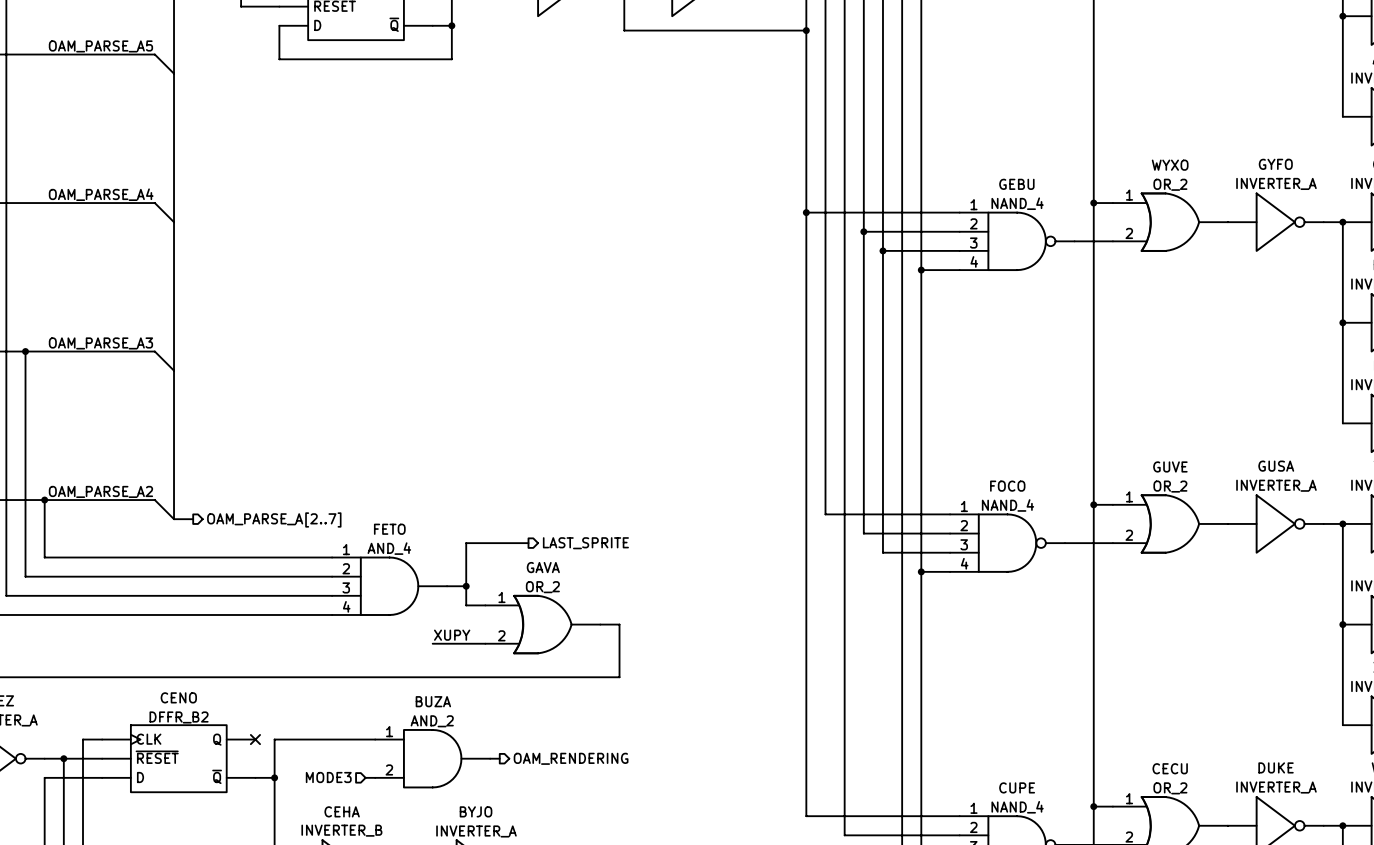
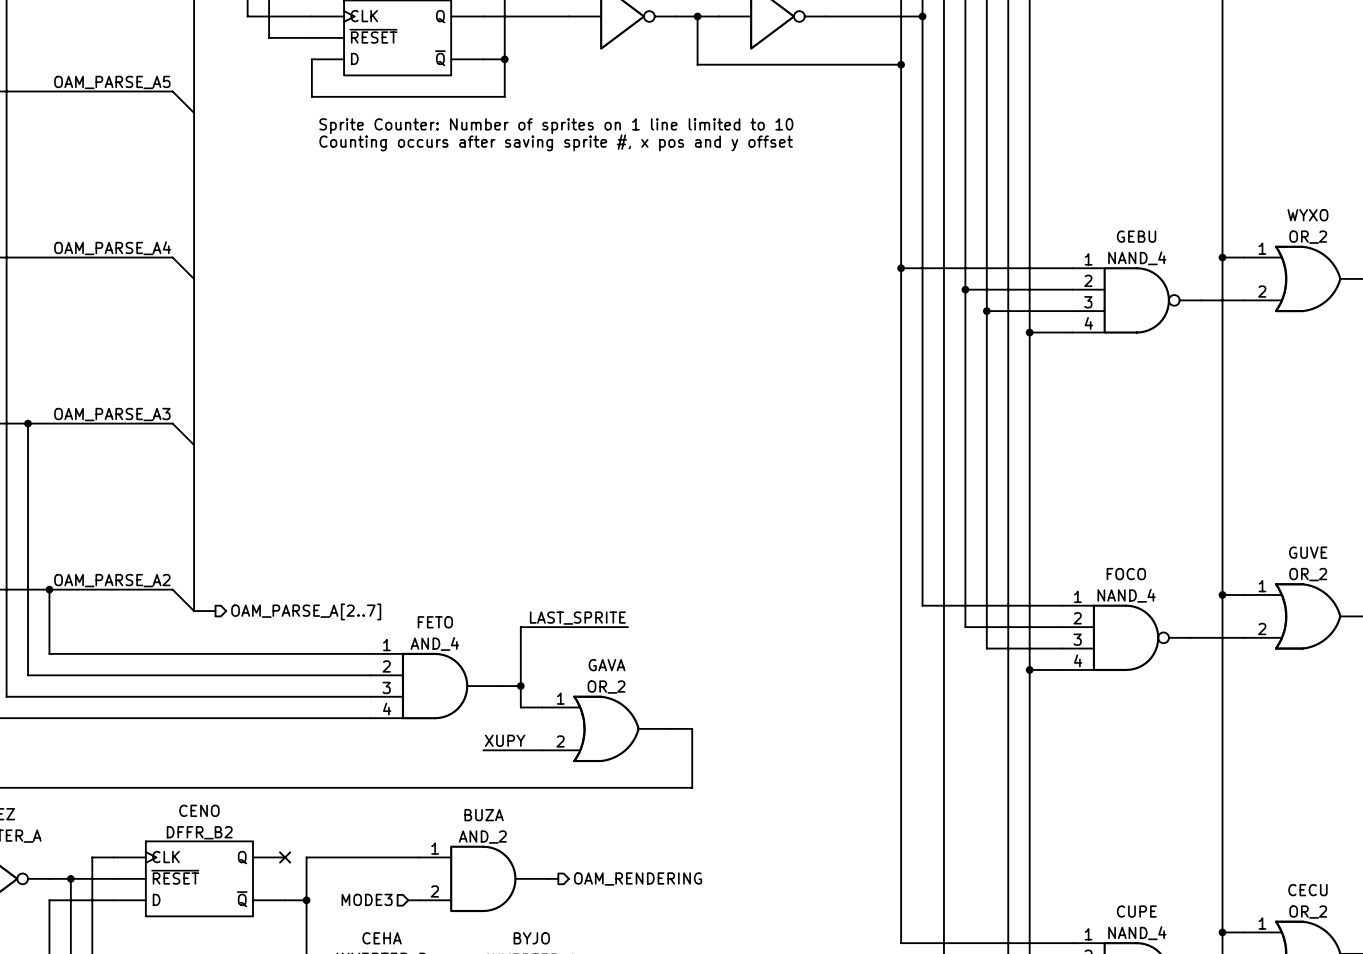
text: none -> Sprite Counter: Number of sprites on 1 line limited to 10 (556, 126)
text: none -> Counting occurs after saving sprite #, x pos and y offset (556, 142)
label: none -> LAST_SPRITE (577, 618)
wire: (466, 543) (528, 543) -> (520, 637) (520, 627) (627, 627)
hierarchical label: LAST_SPRITE (585, 543) -> none

